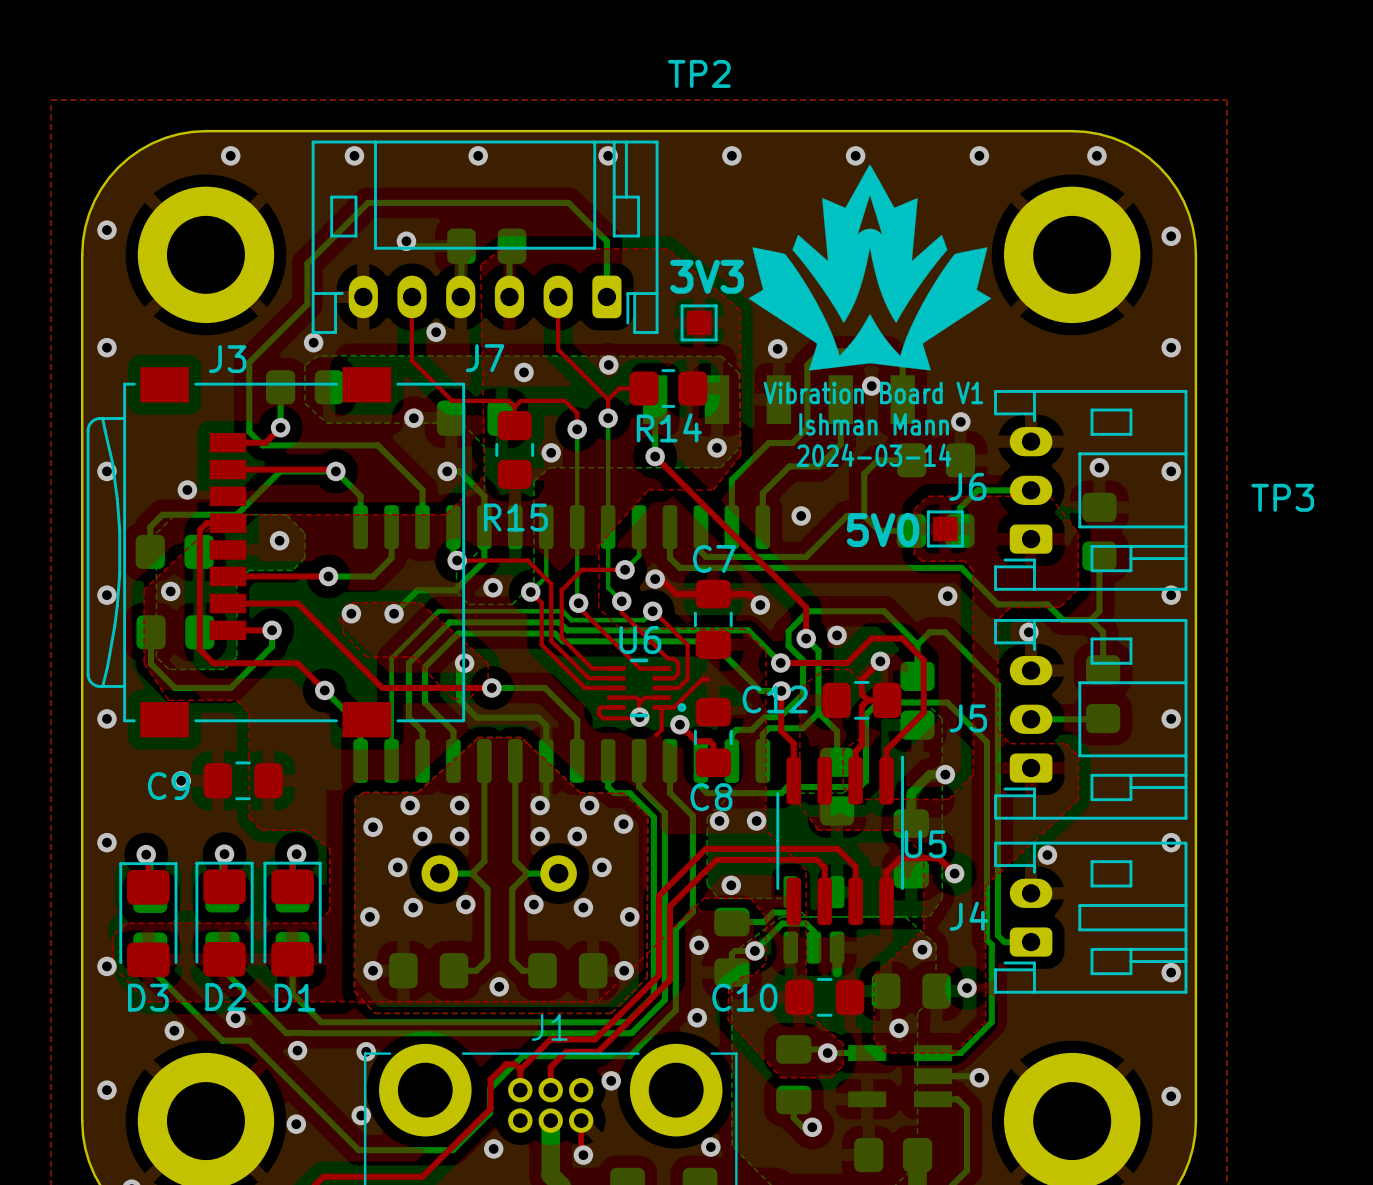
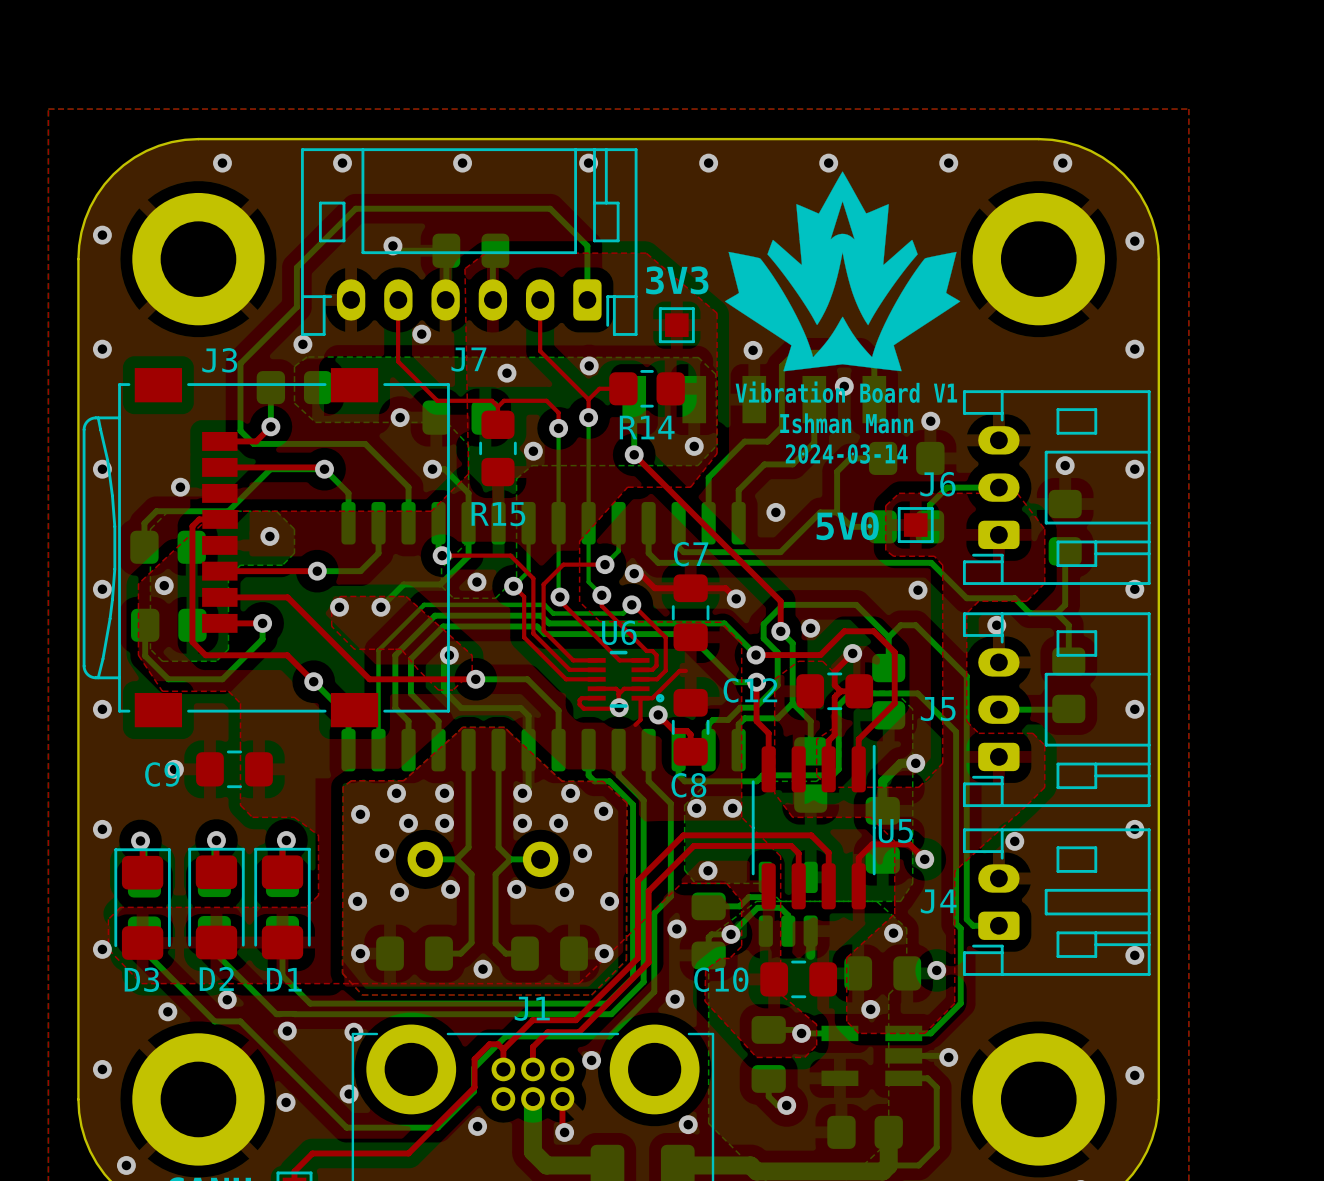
TP2 name: TP2 (699, 73) -> none
TP3 name: TP3 (1282, 497) -> none

